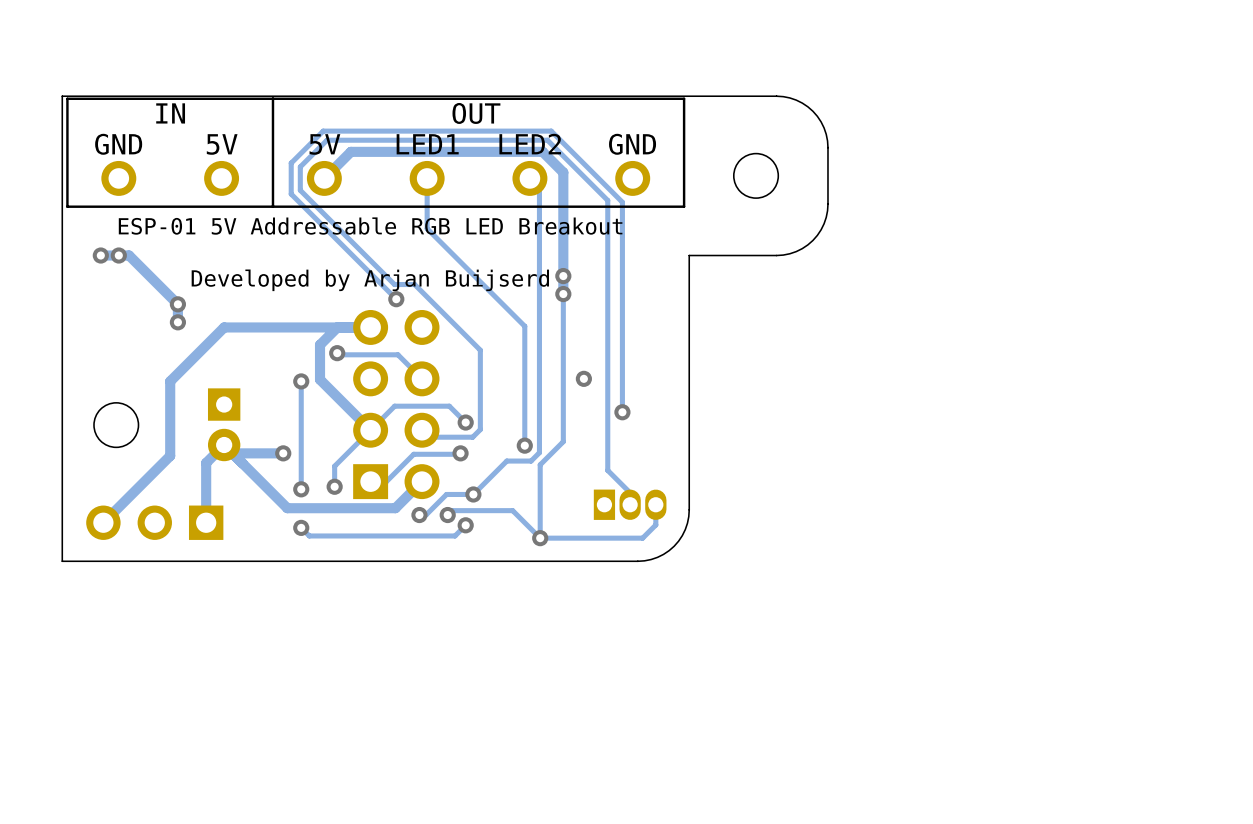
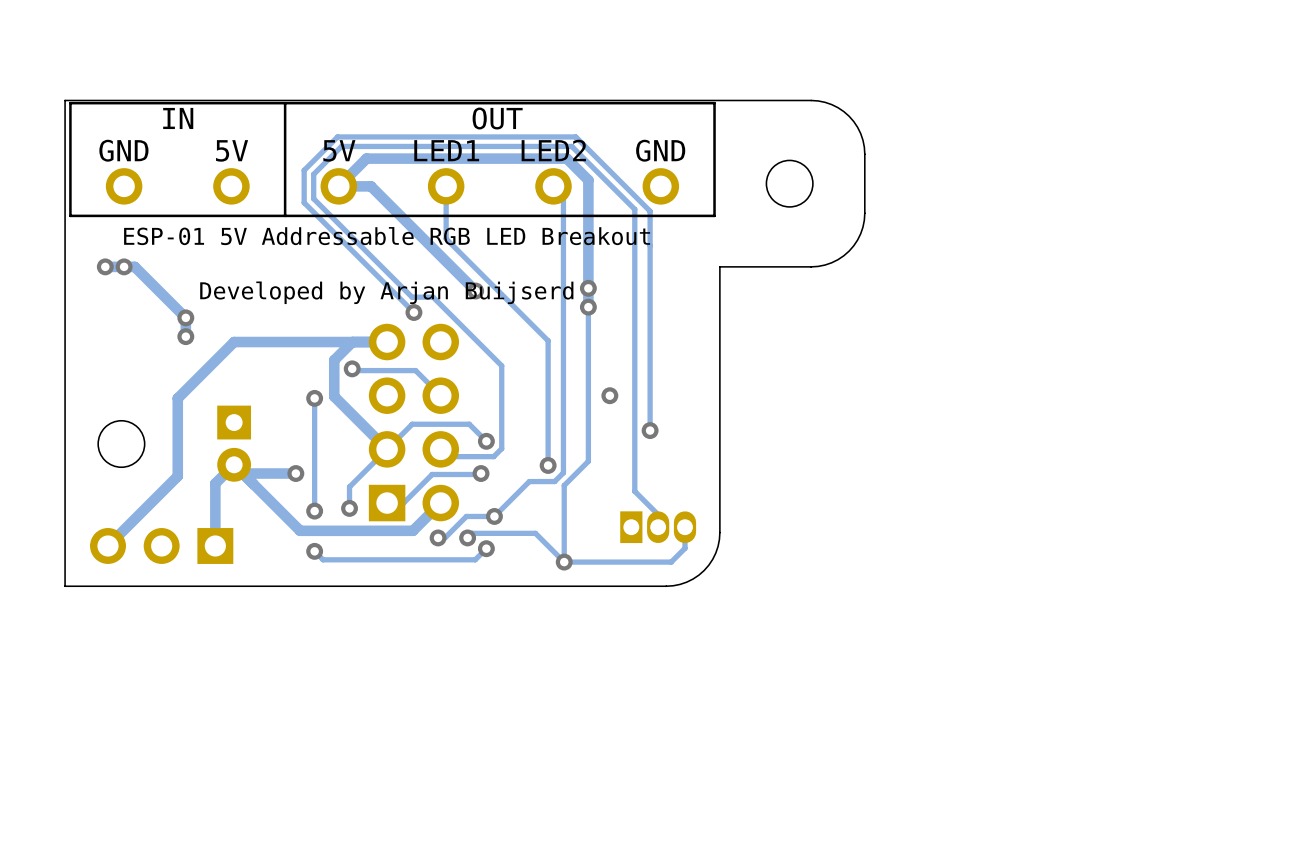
track: none -> (338, 186) (371, 186) (475, 291)
via: none -> (475, 291)

